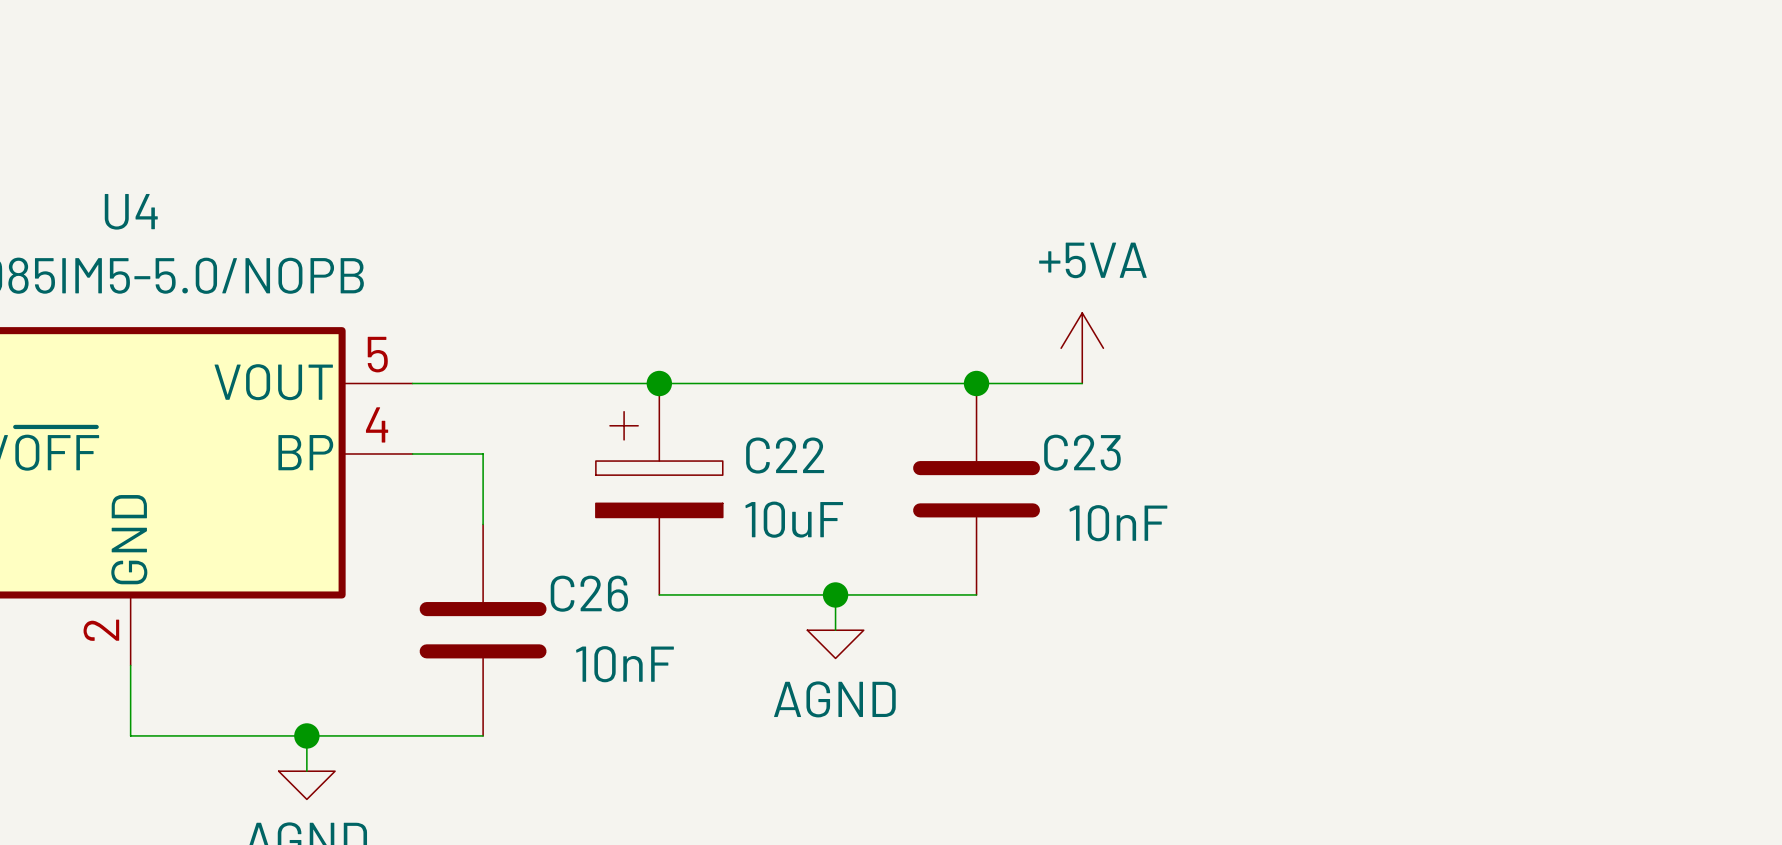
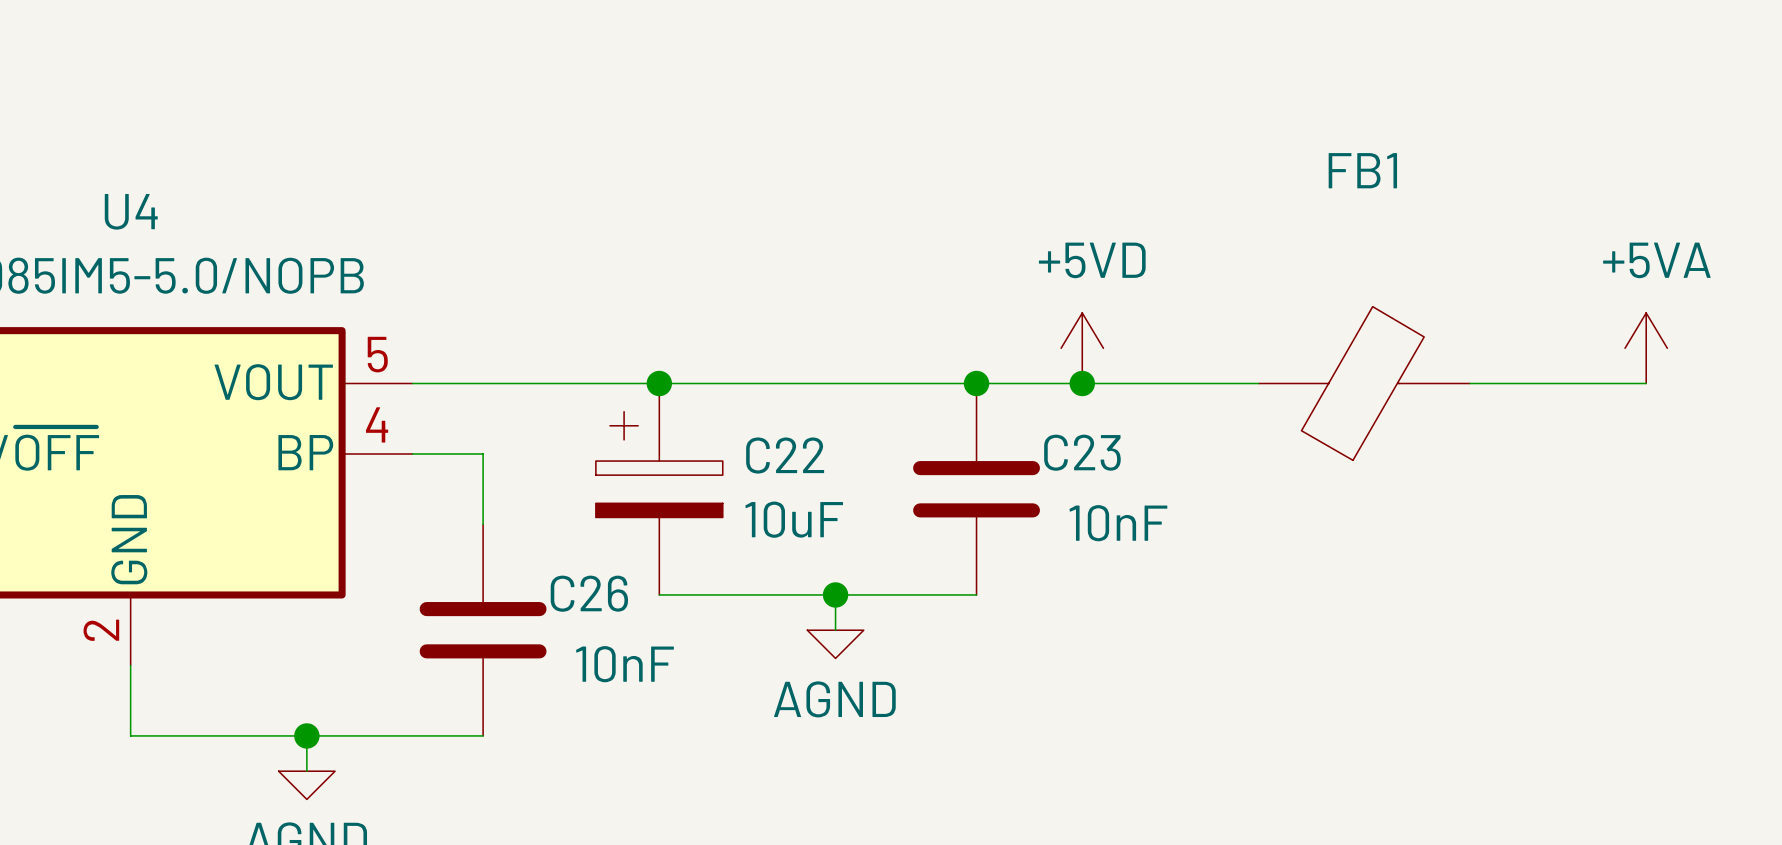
power symbol: +5VA (1082, 348) -> +5VD (1082, 348)
power symbol: none -> +5VA (1646, 348)
wire: none -> (1082, 383) (1258, 383)
junction: none -> (1082, 383)
FB1: none -> (1364, 383)
wire: none -> (1469, 383) (1646, 383)

